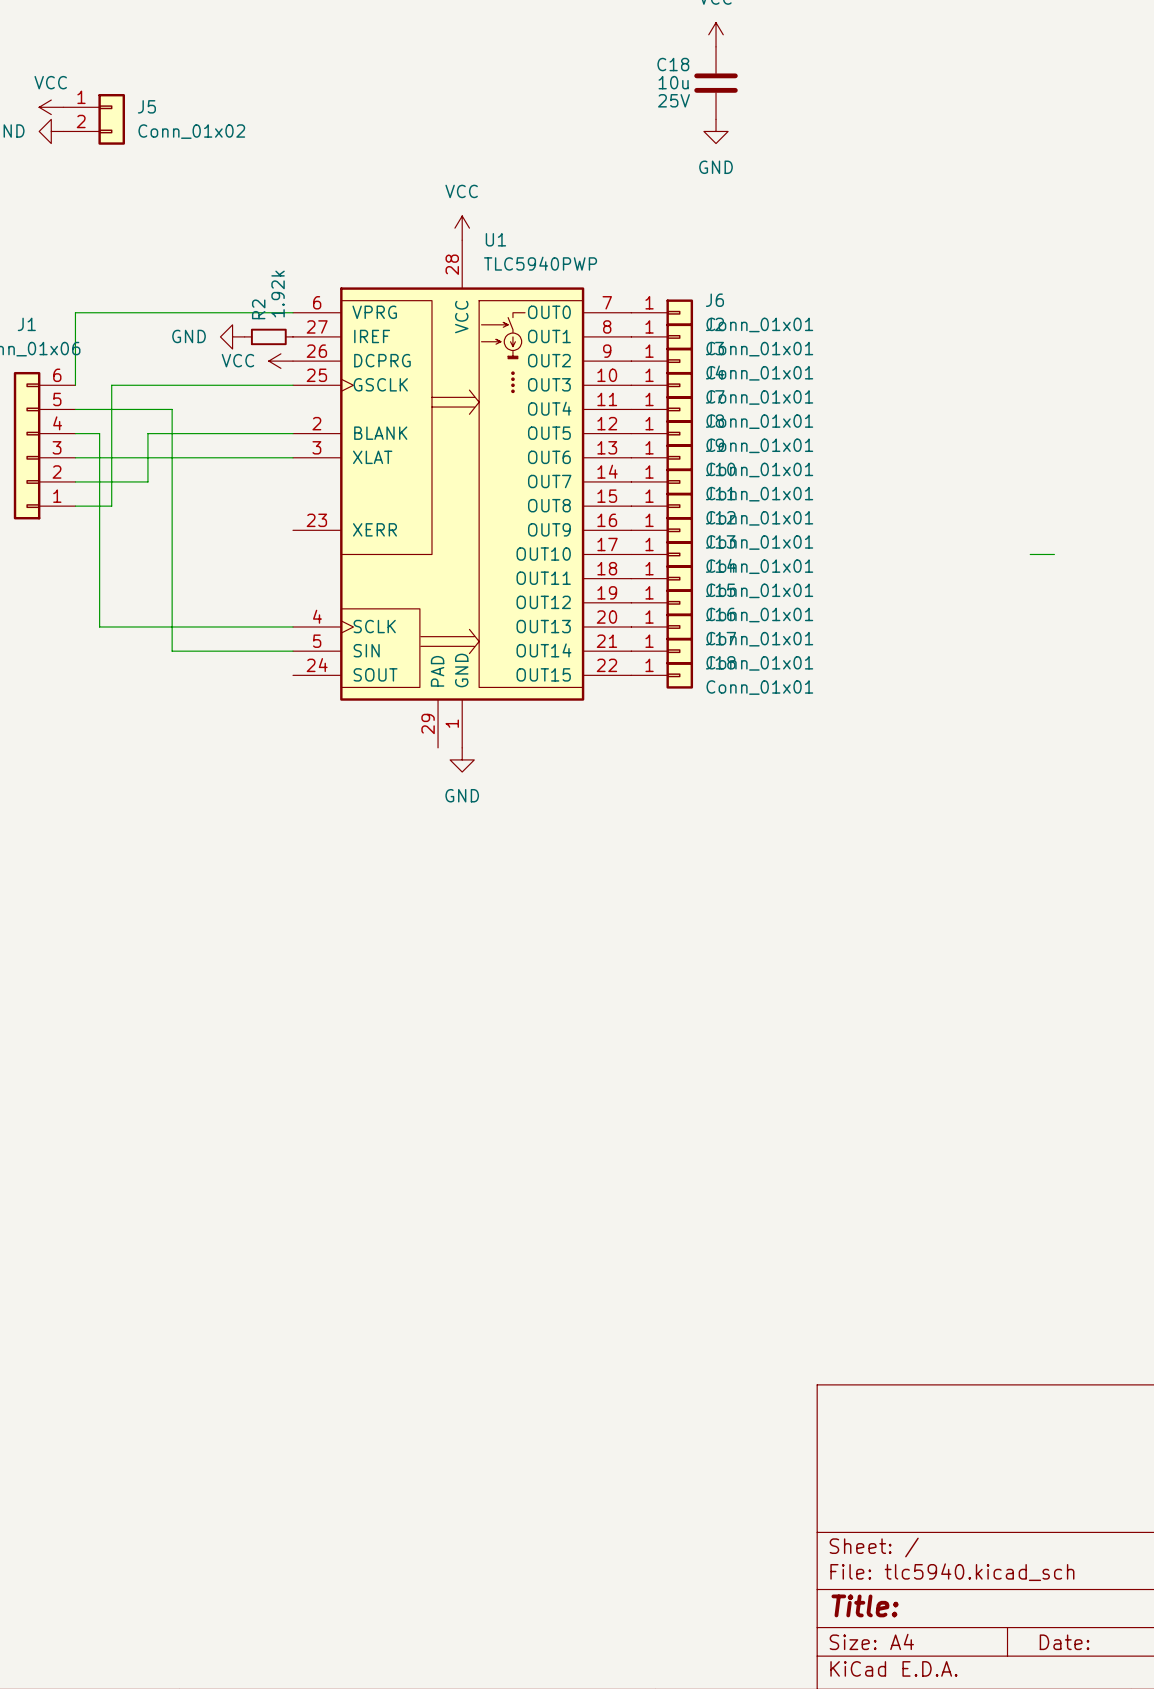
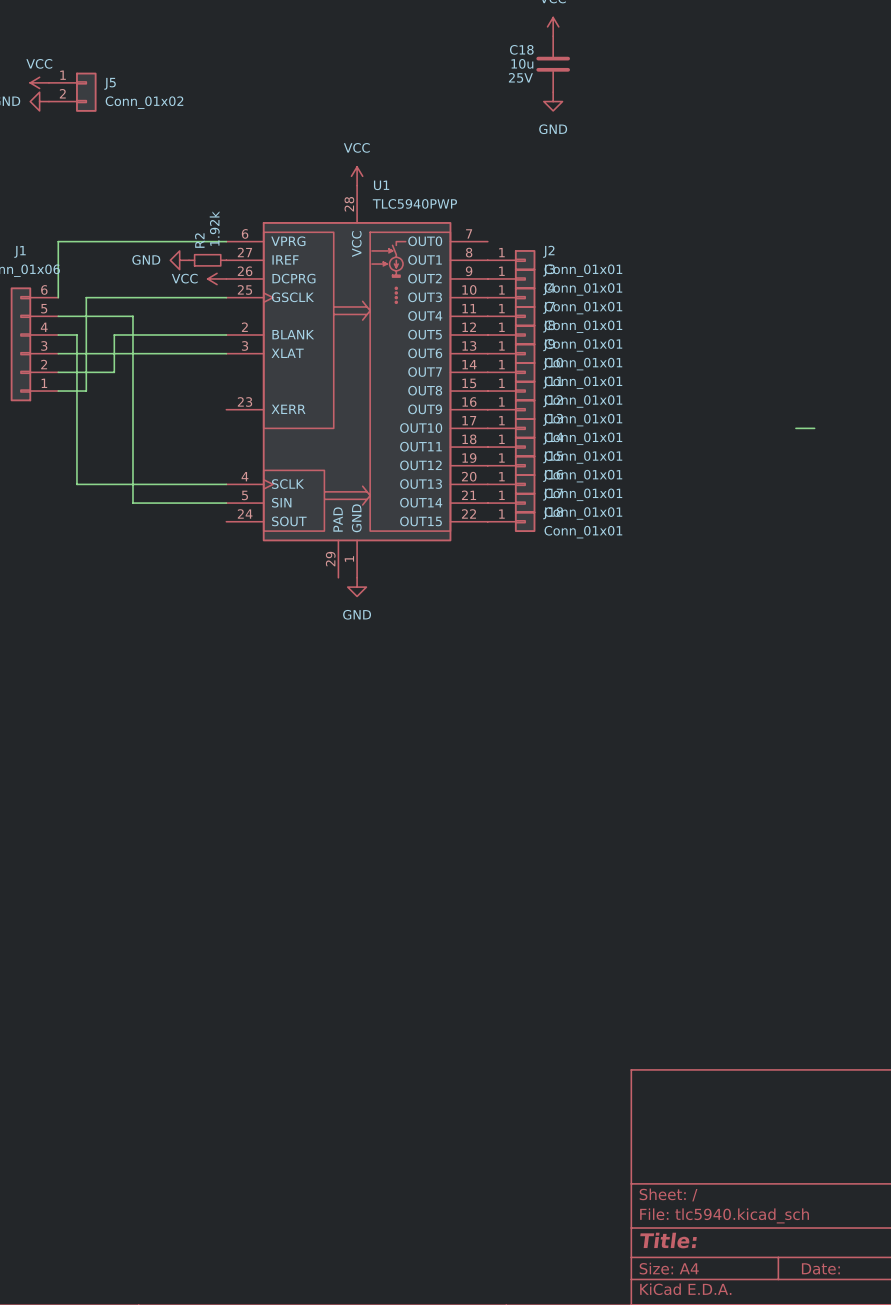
J6: Conn_01x01 (662, 312) -> none

